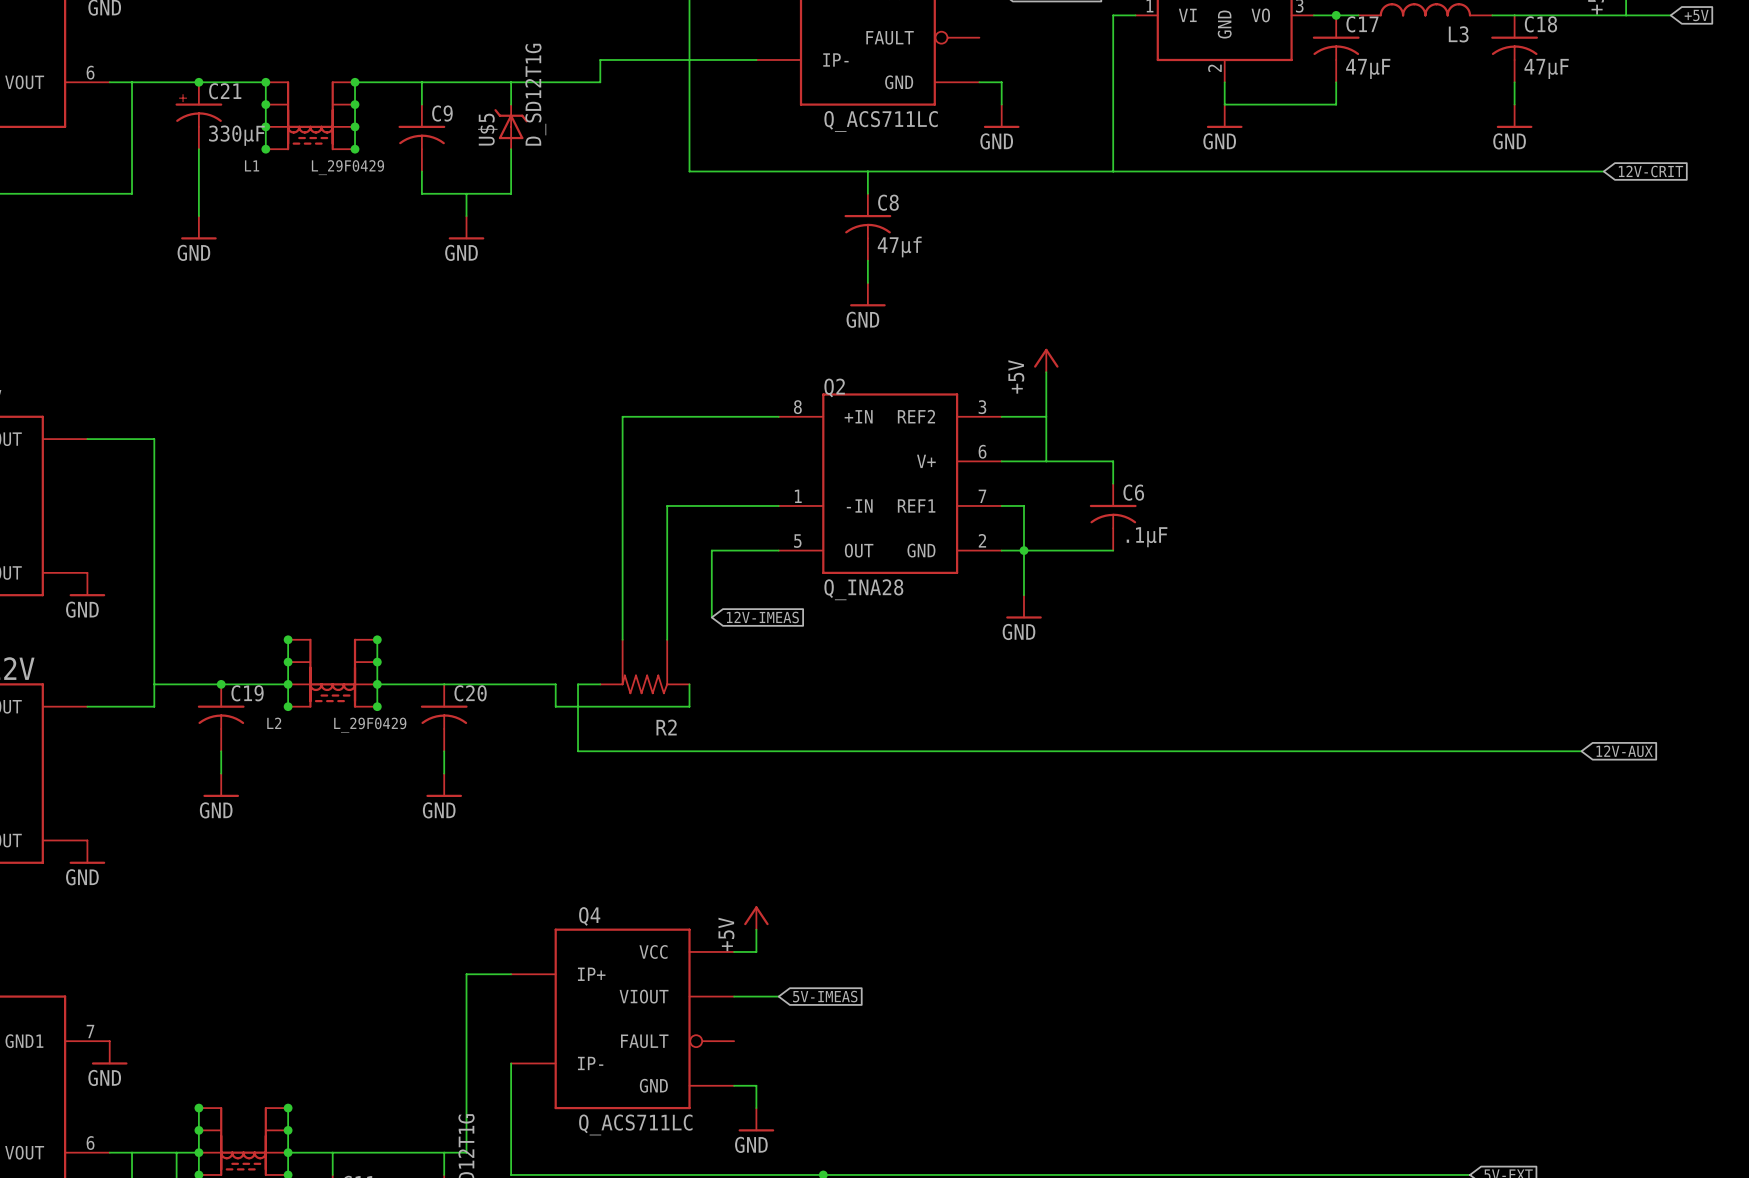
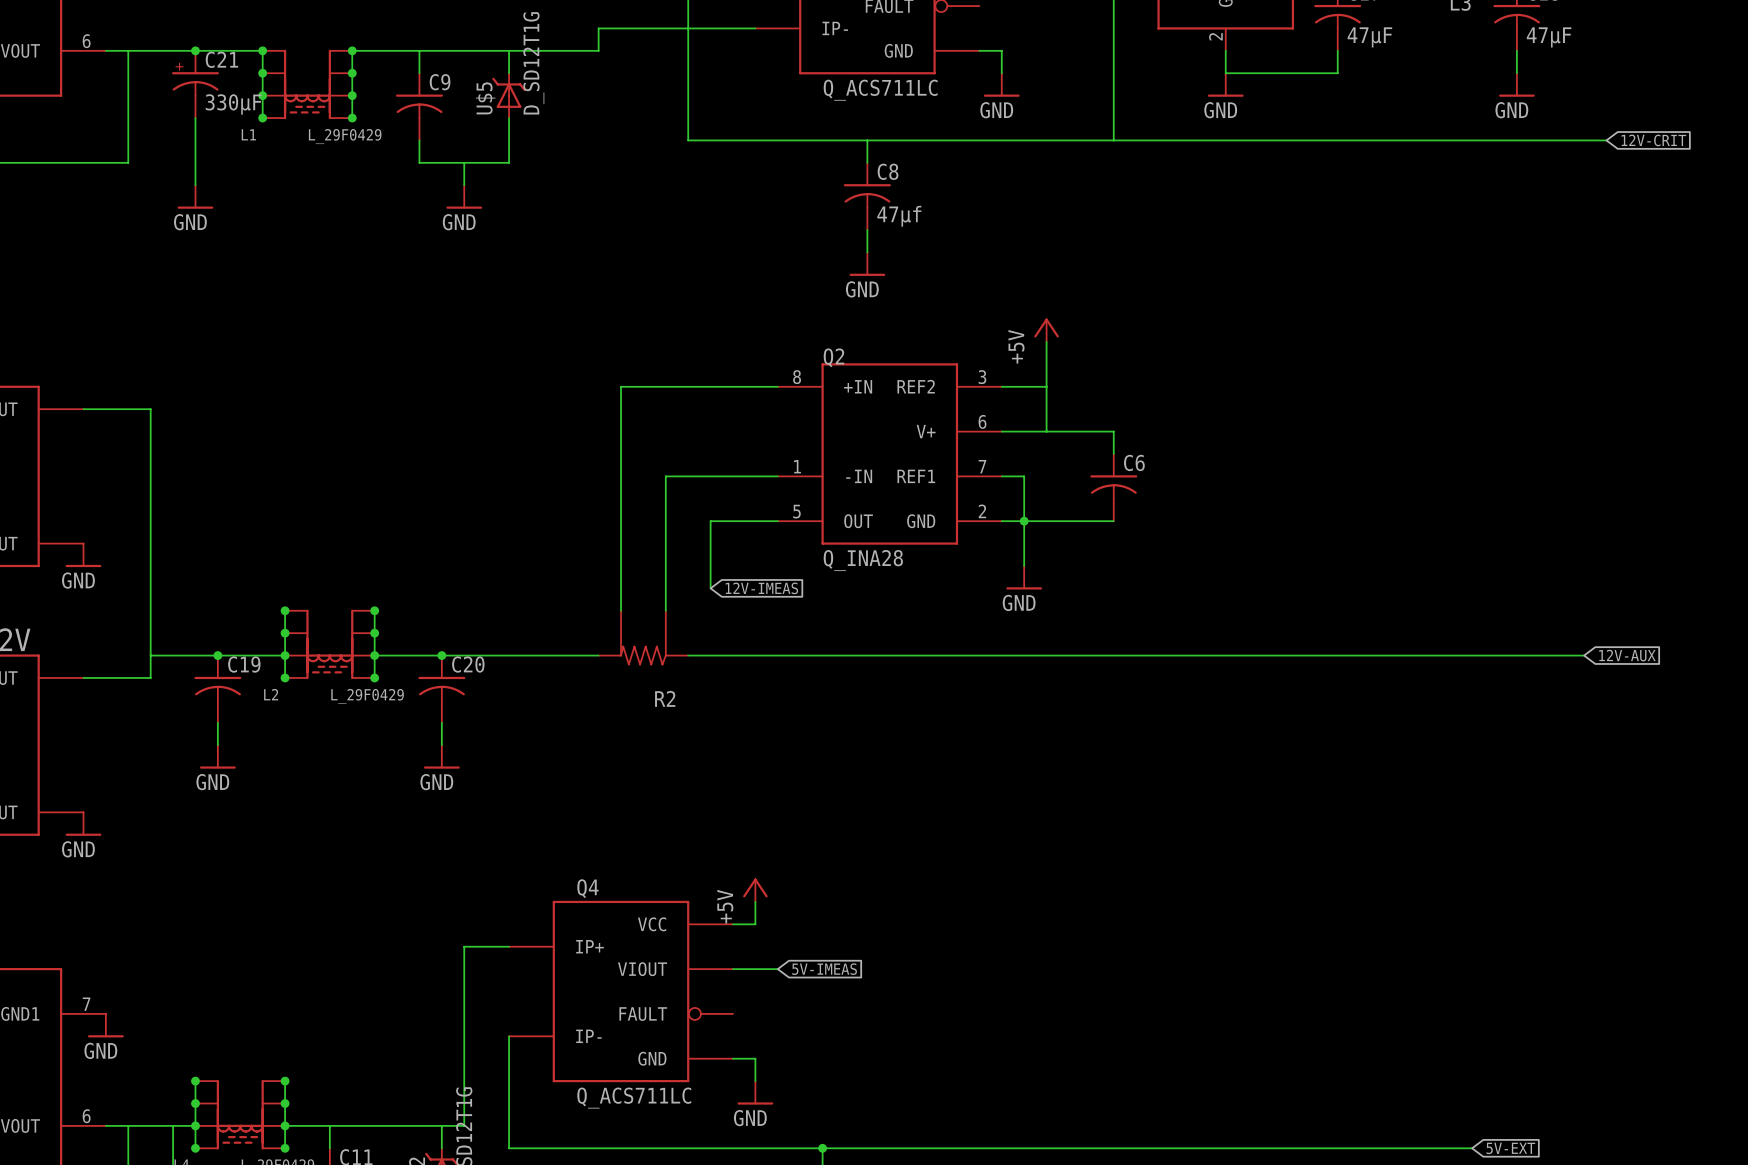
C6 value: .1µF (1147, 537) -> none
junction: none -> (441, 655)
wire: (555, 684) (555, 706) (689, 706) (689, 684) -> (553, 655) (576, 655)
wire: (578, 684) (578, 751) (1581, 751) -> none
wire: none -> (688, 655) (1584, 655)
global label position: 12V-AUX (1624, 751) -> 12V-AUX (1627, 655)

